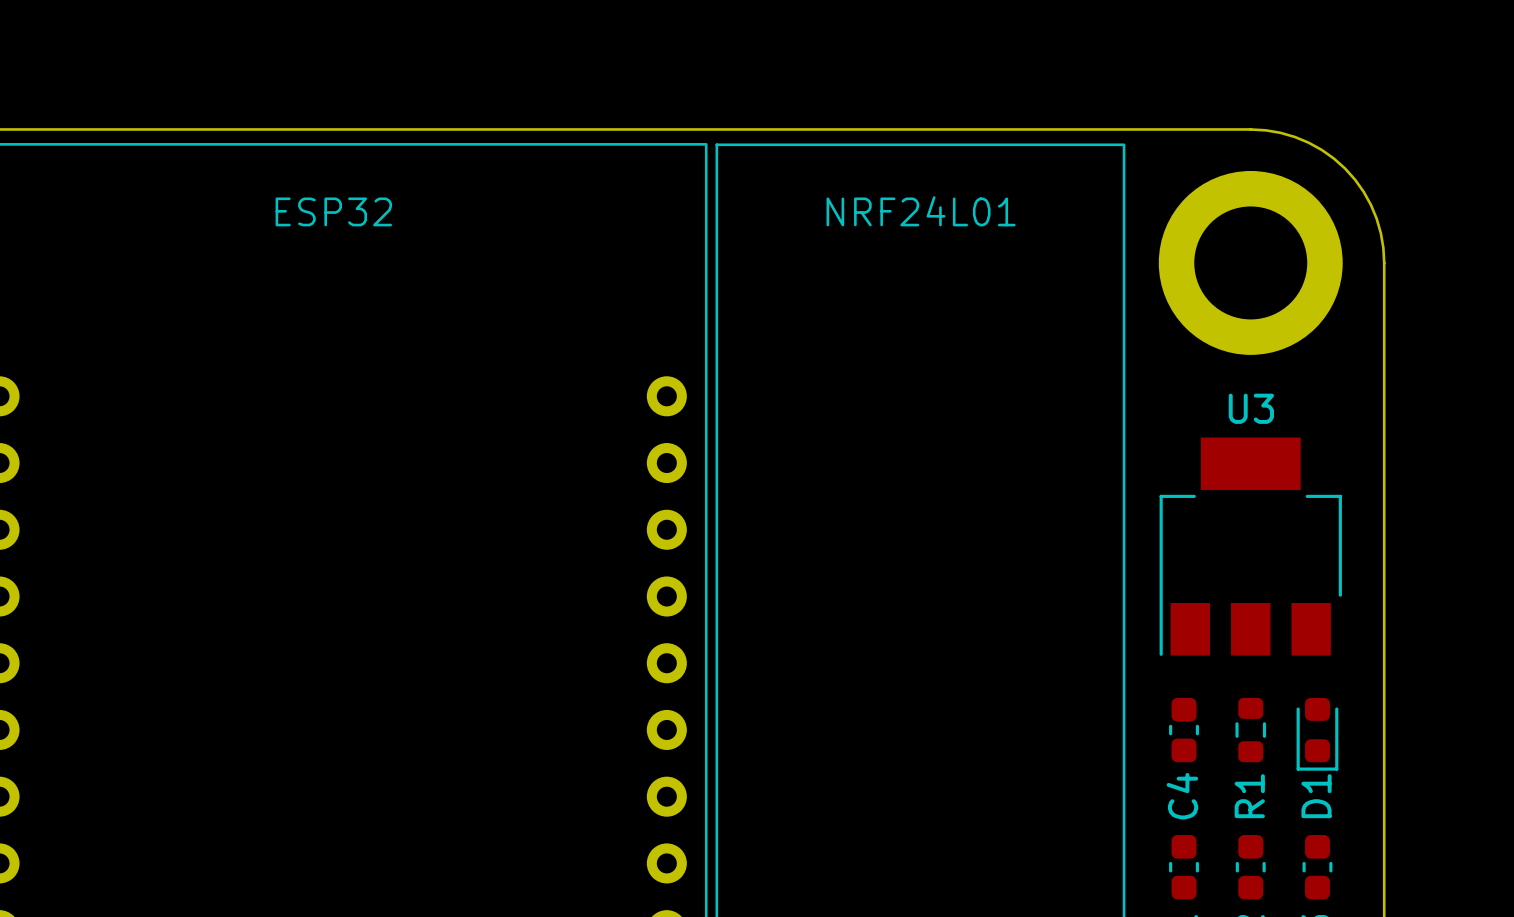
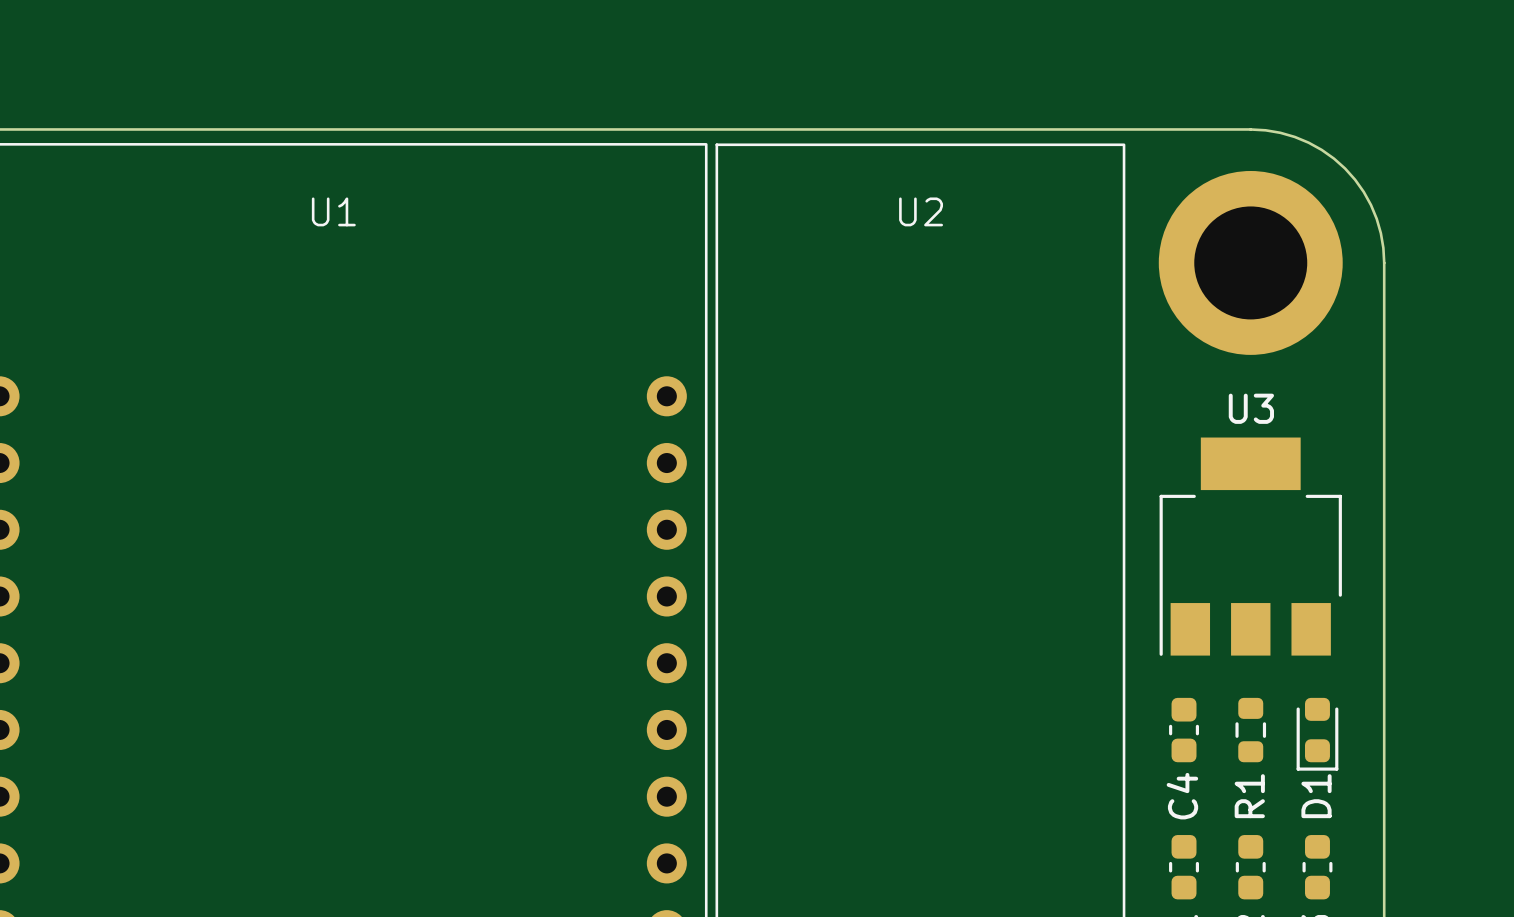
ESP32 name: ESP32 (333, 211) -> U1 (333, 211)
NRF24L01 name: NRF24L01 (921, 211) -> U2 (921, 211)

